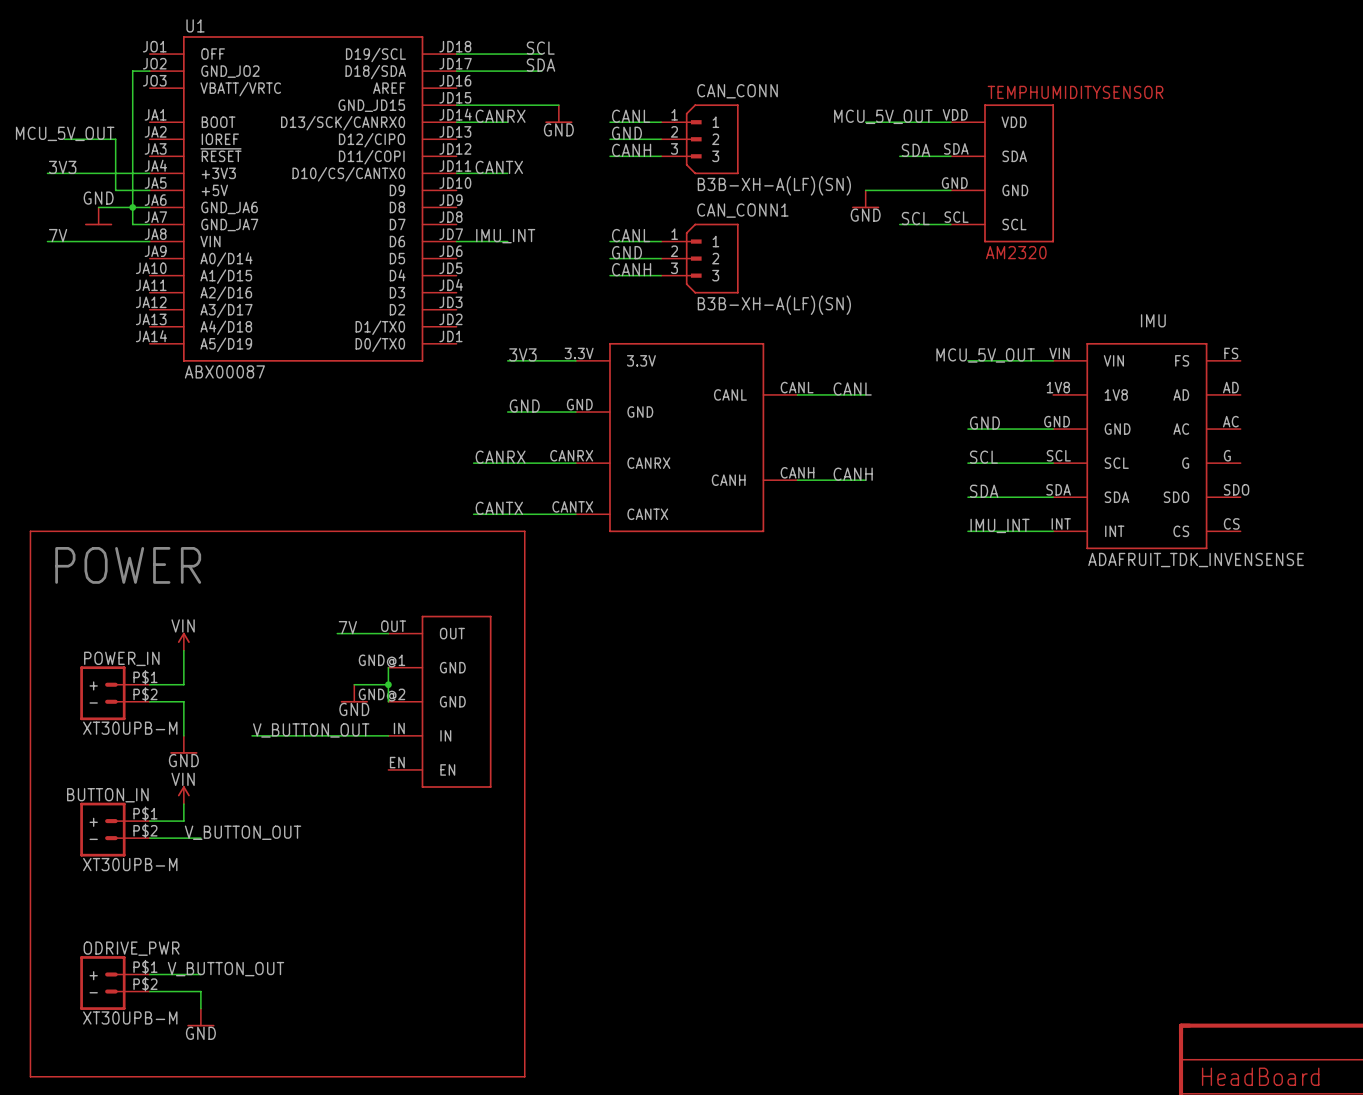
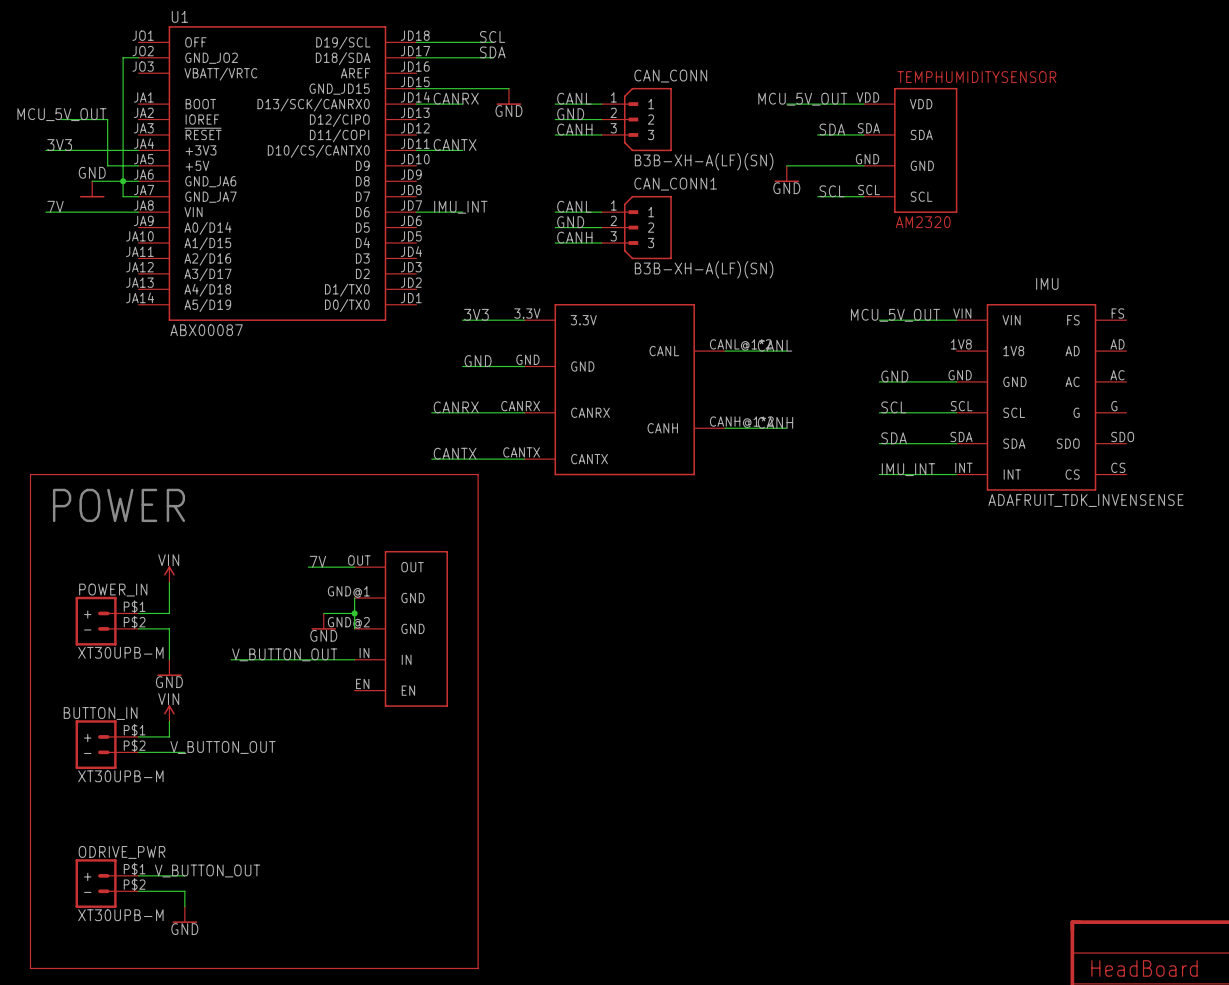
part pin number: CANL (797, 387) -> CANL@1*2 (740, 345)
part pin number: CANH (797, 472) -> CANH@1*2 (741, 422)

